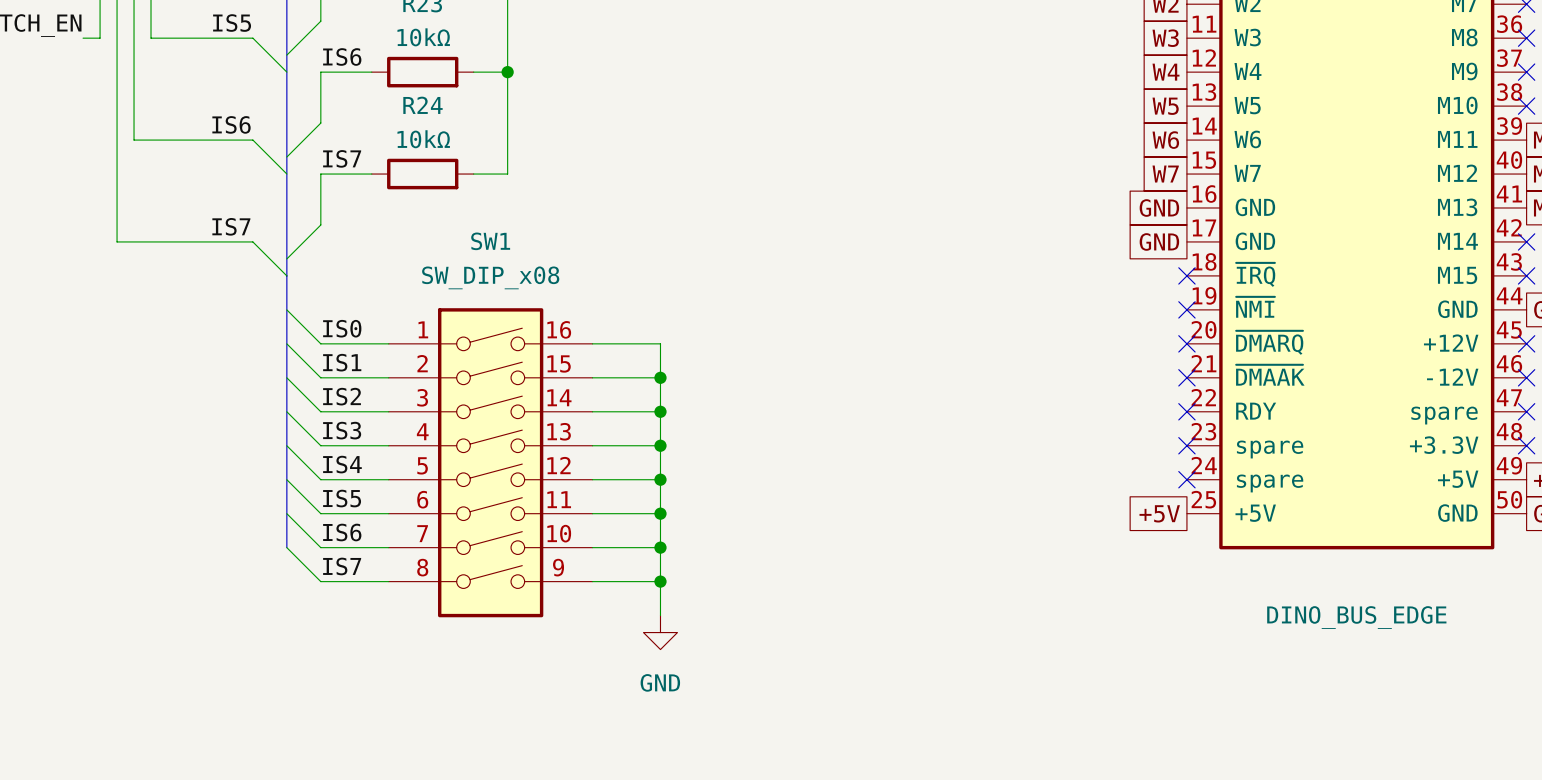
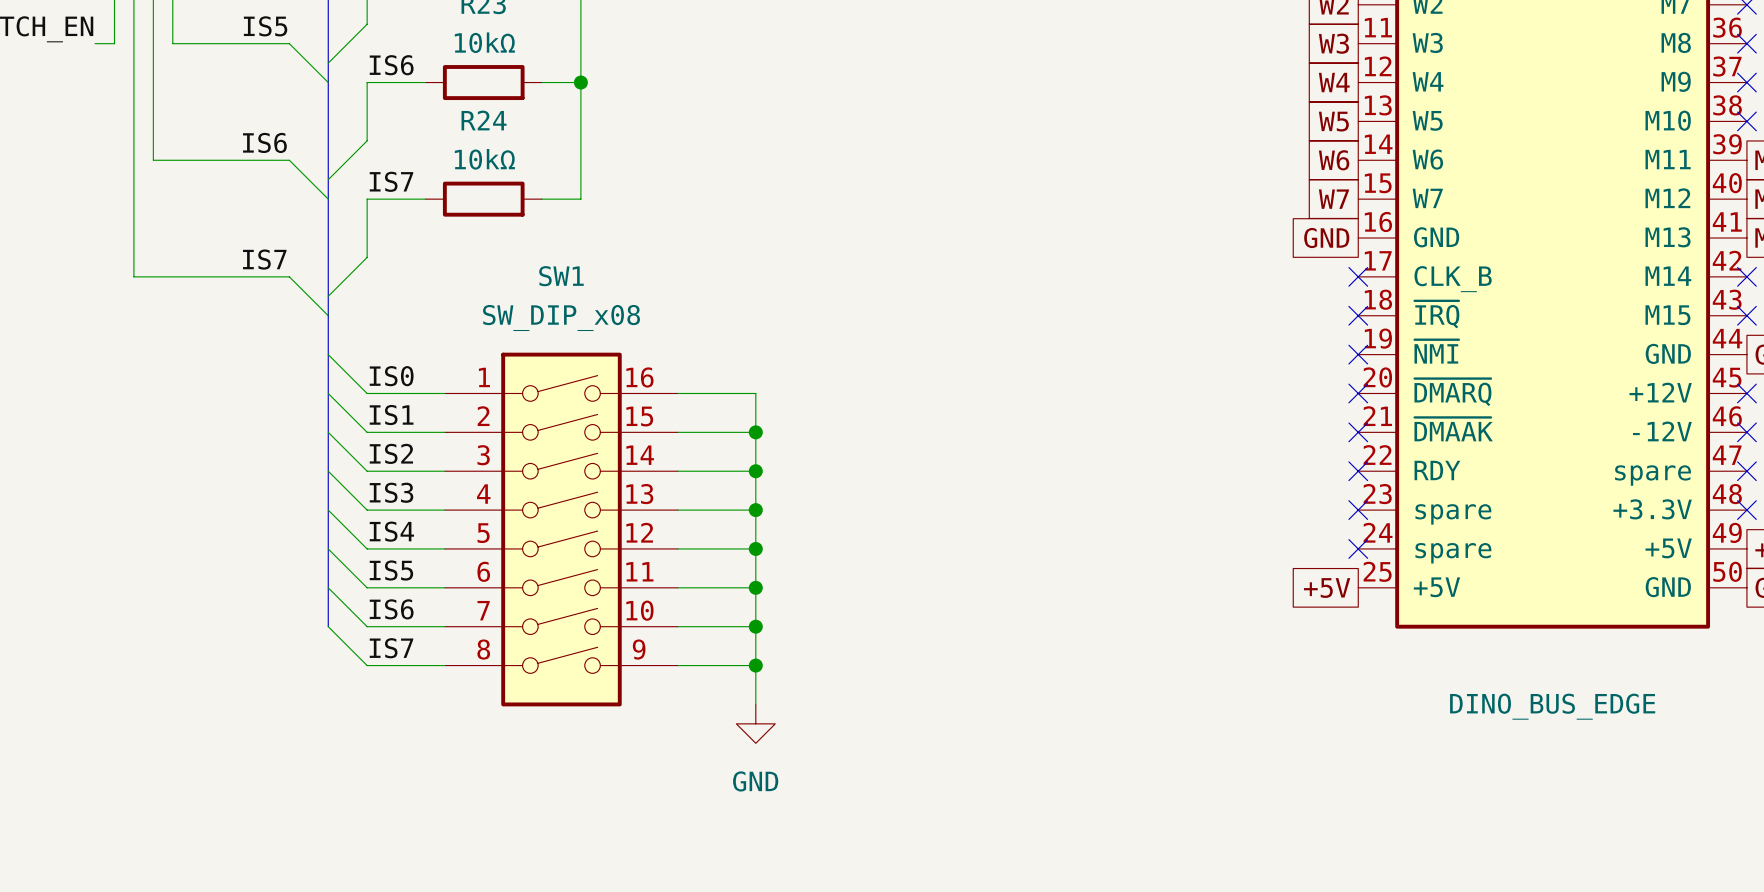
global label: GND (1159, 241) -> none
no-connect mark: none -> (1358, 276)
part pin name: GND (1255, 241) -> CLK_B (1453, 279)

